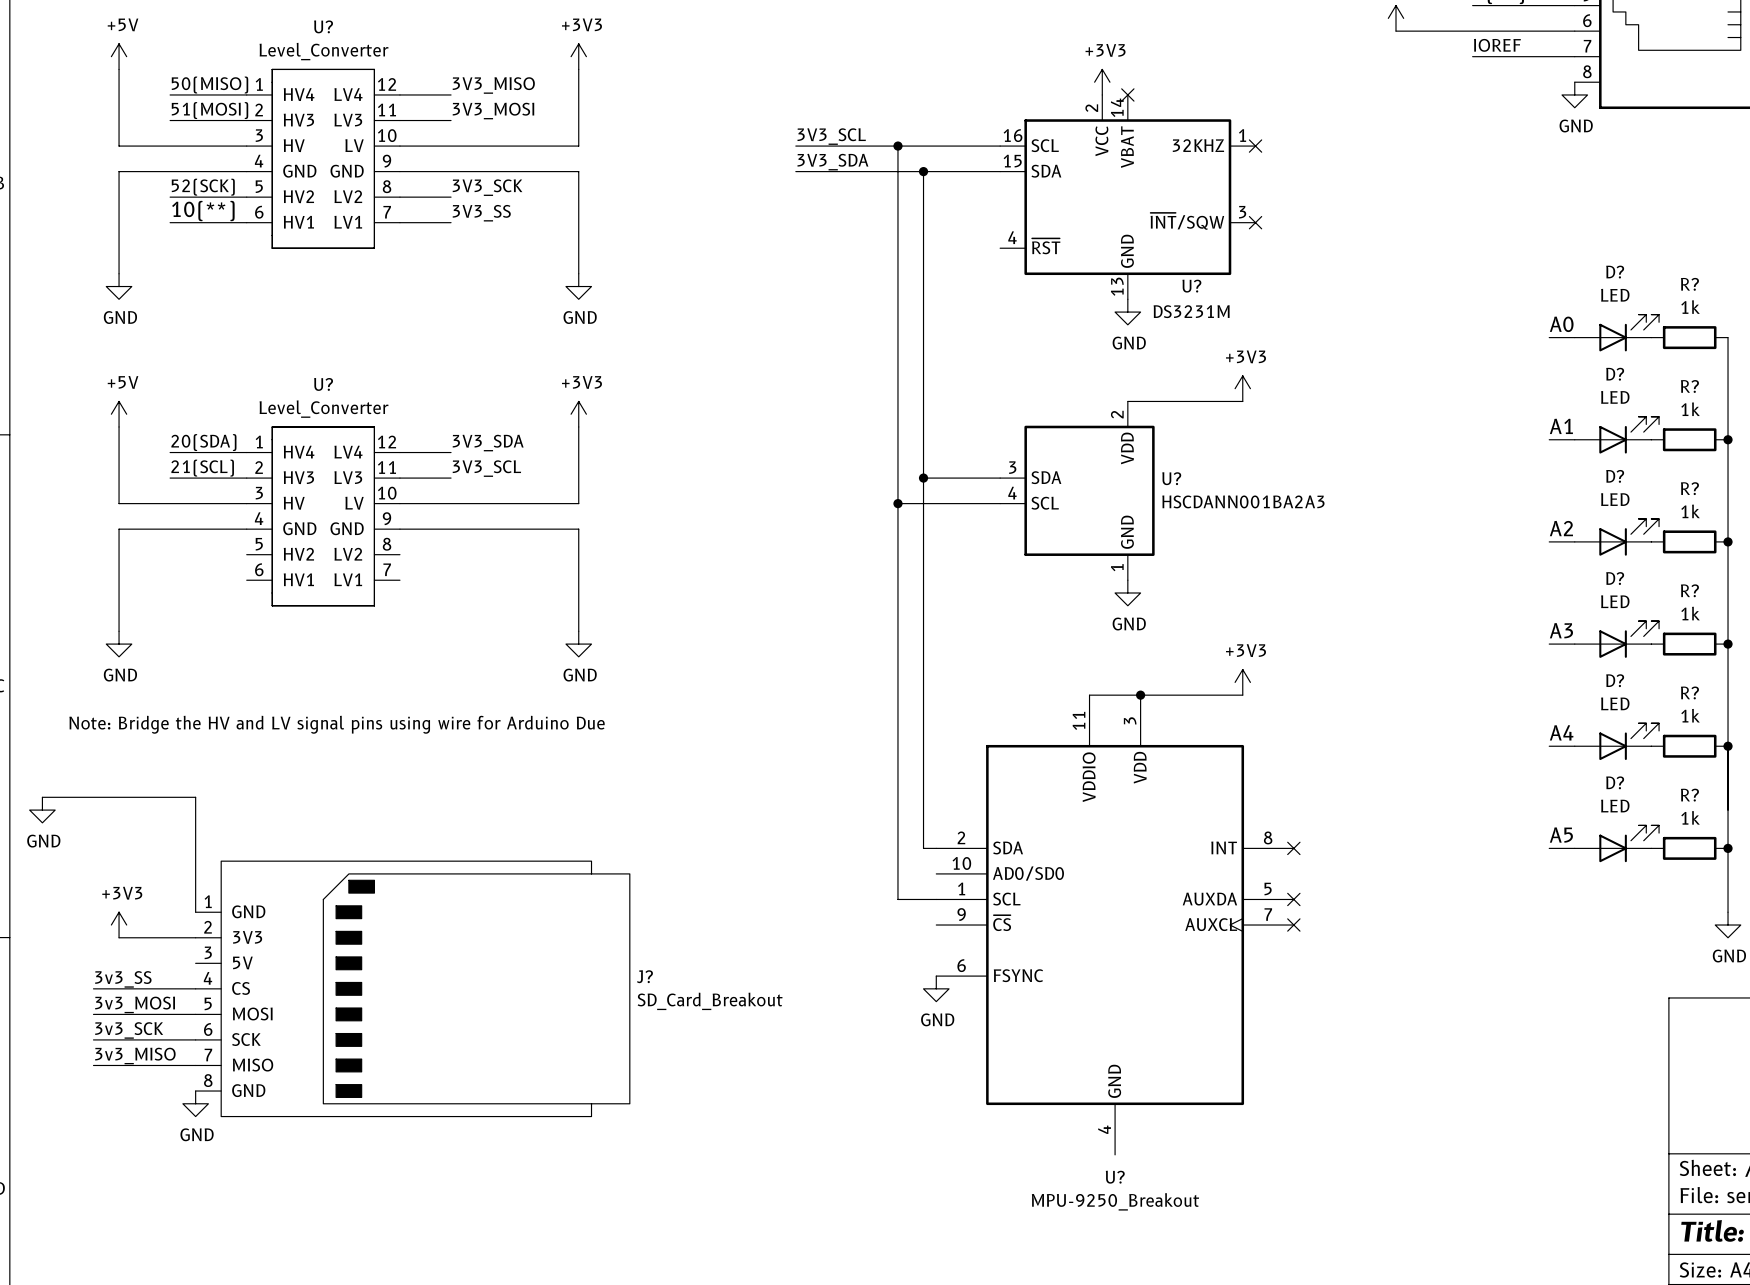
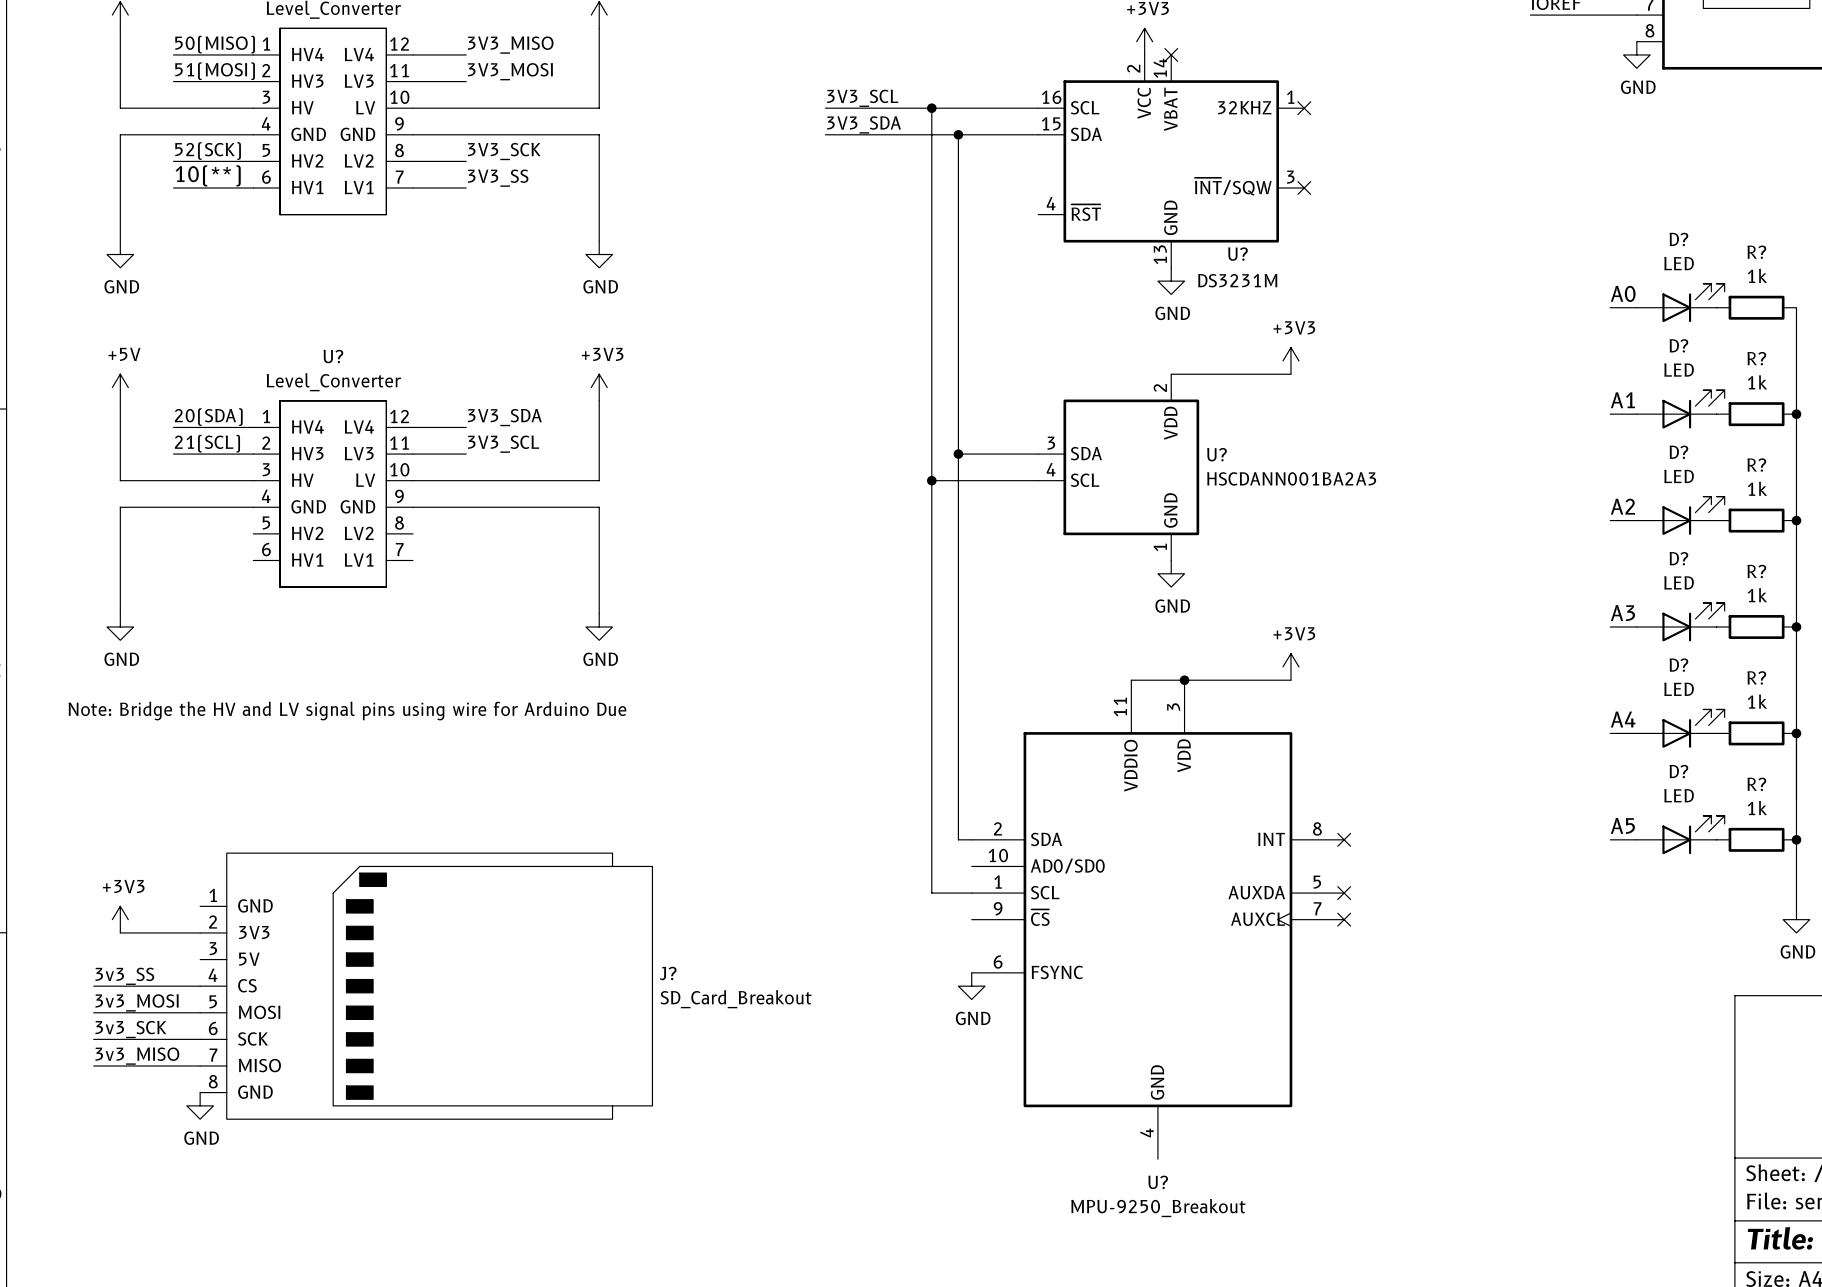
wire: (42, 797) (195, 797) (195, 912) -> none
power symbol: GND (42, 810) -> none

